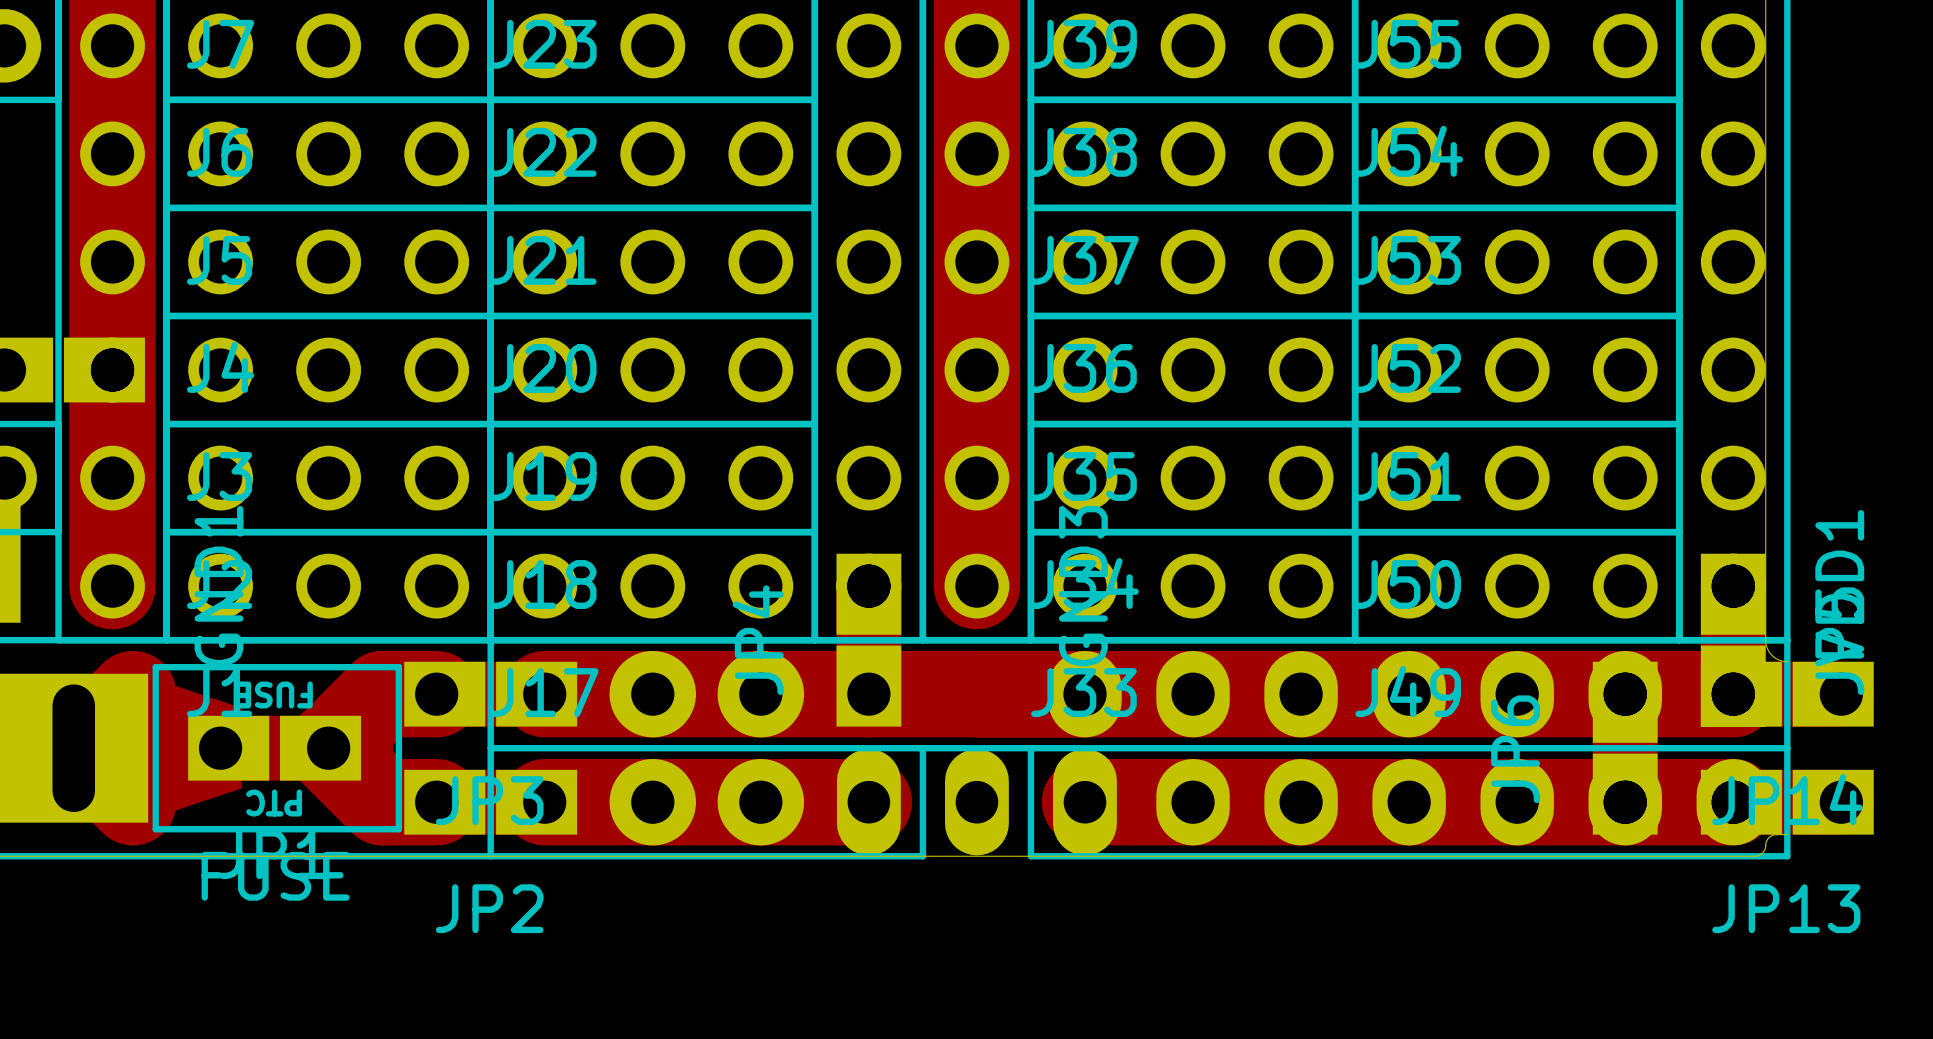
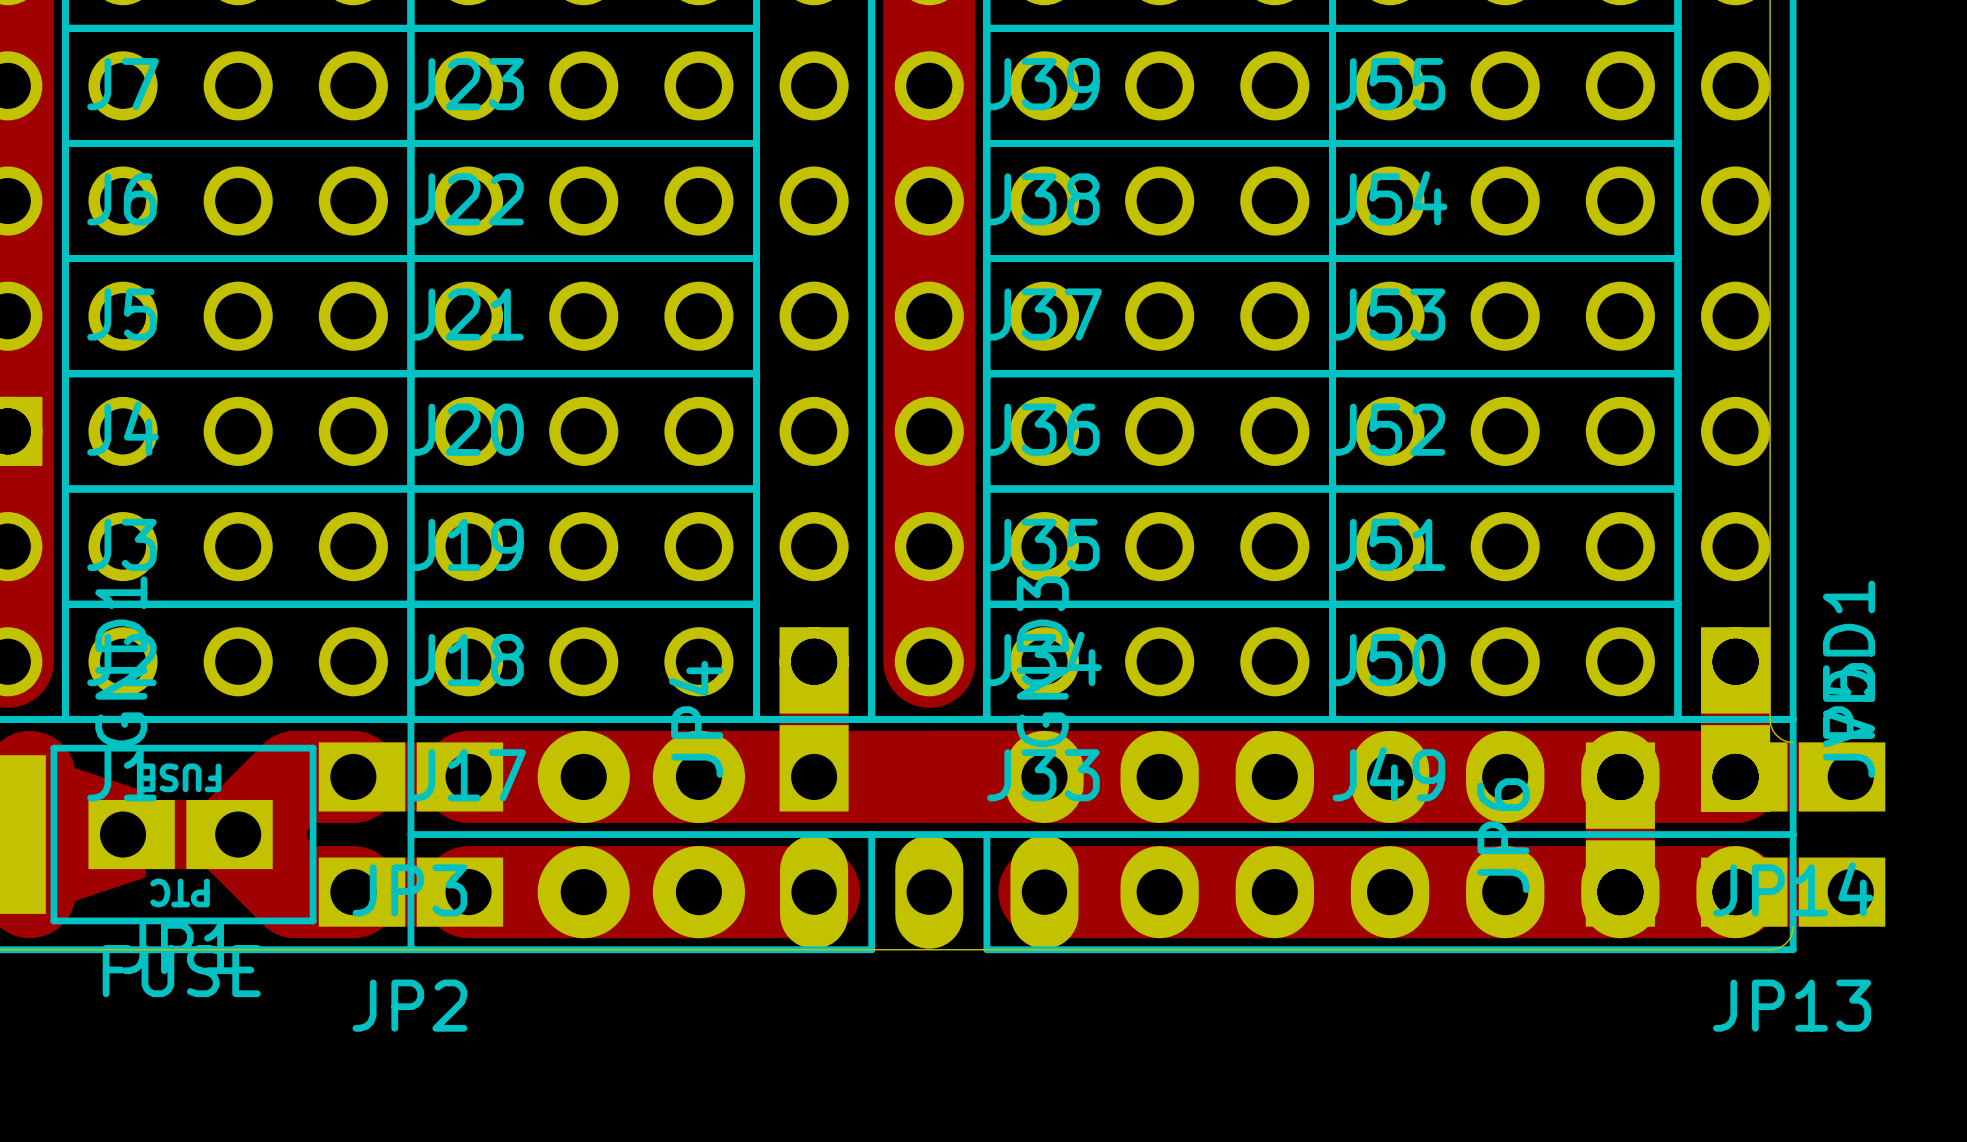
board edge: (1787, 834) (1771, 836) (1766, 841) (1763, 852) (1754, 856) -> (1793, 926) (1790, 938) (1781, 946) (1773, 949) (1758, 949)

